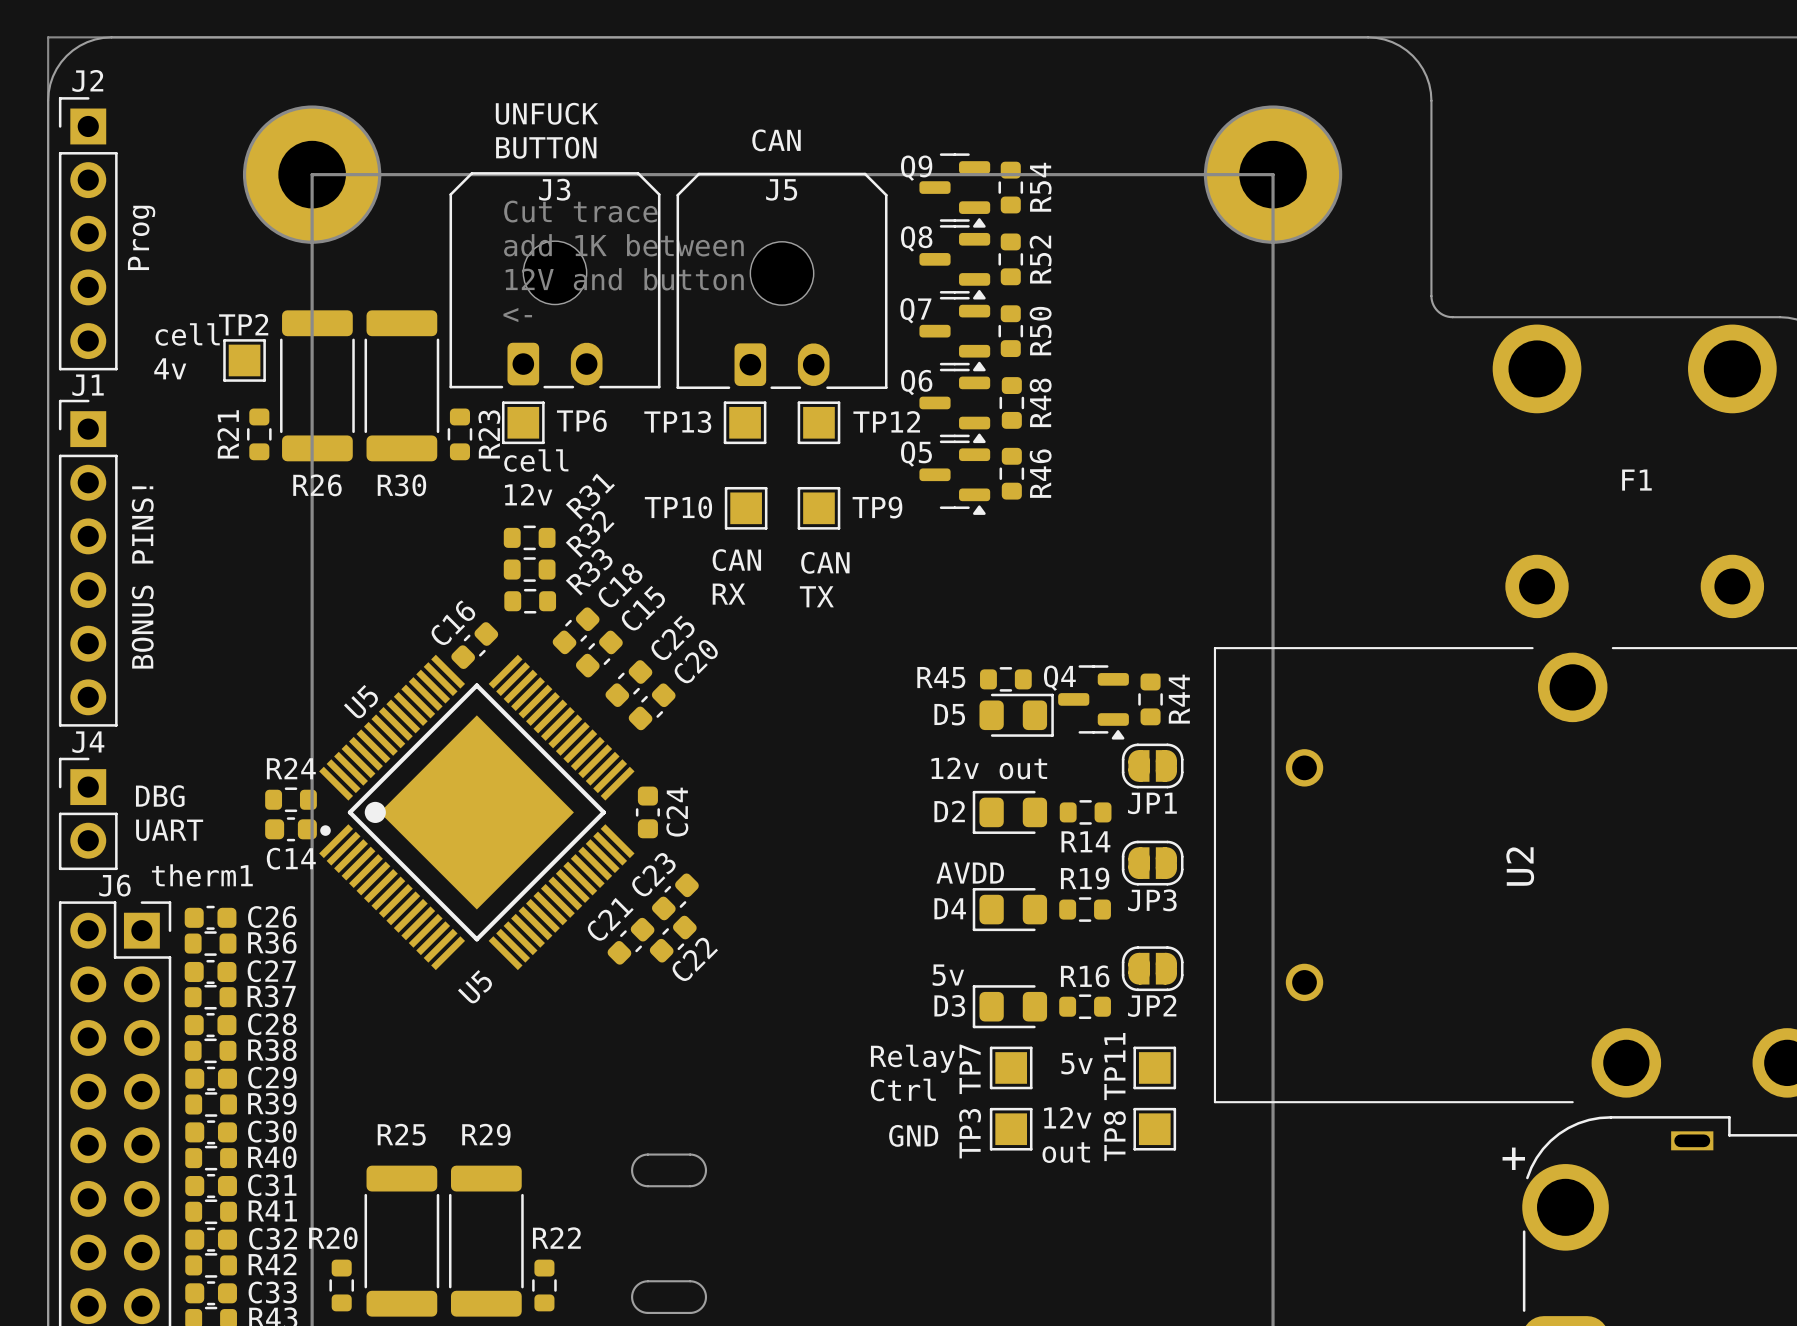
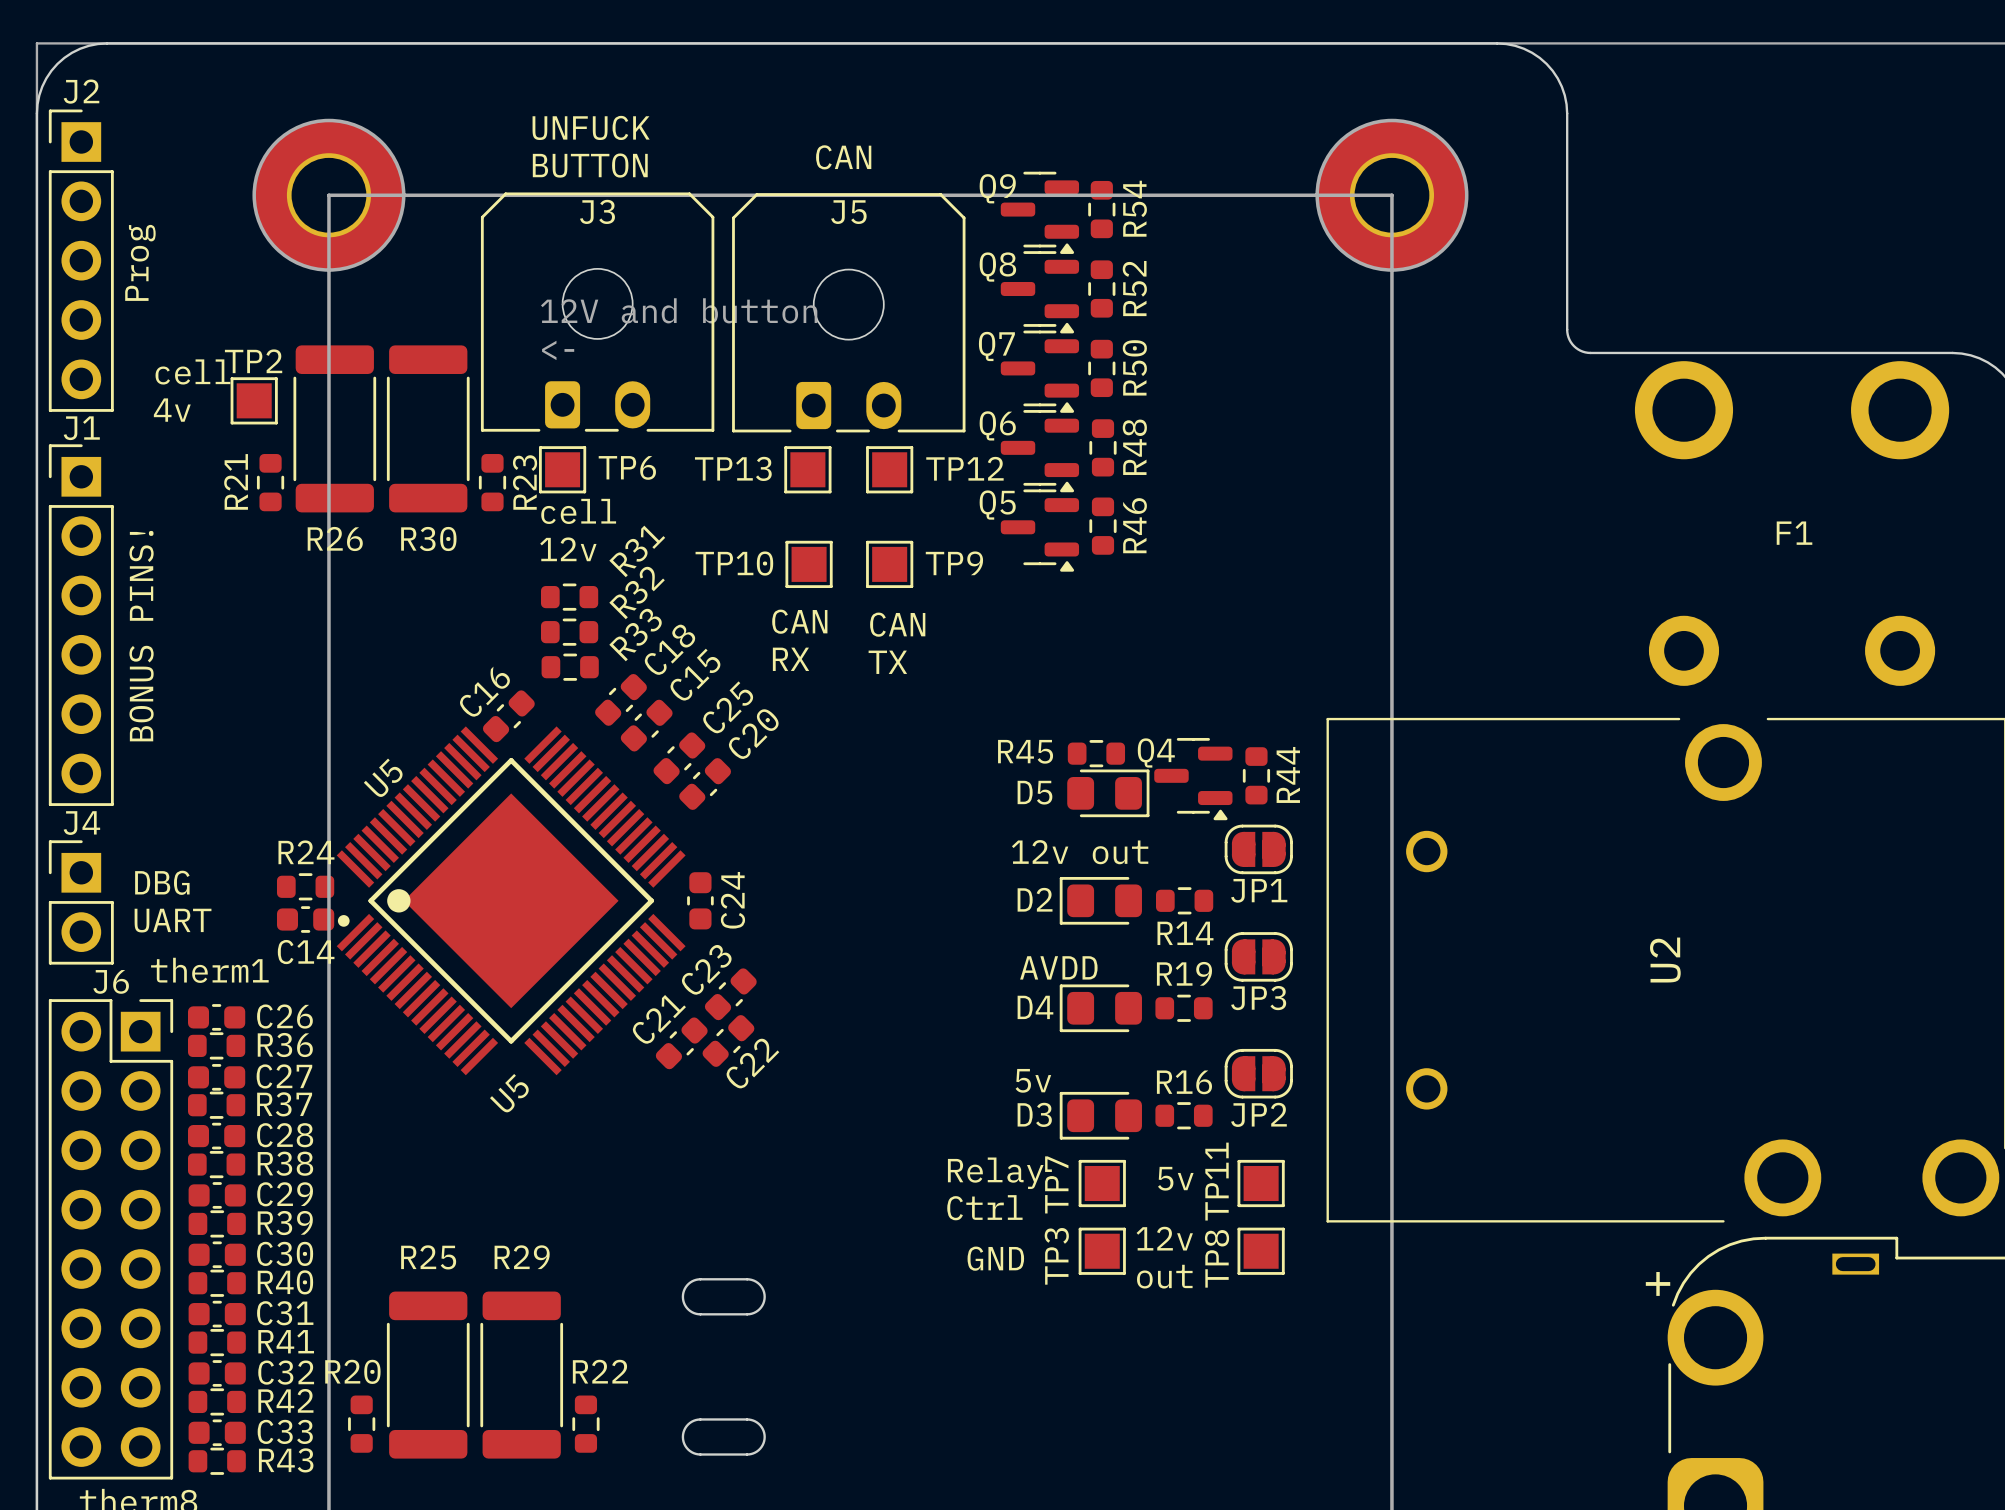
text: Cut trace (580, 211) -> none
text: add 1K between (623, 245) -> none

